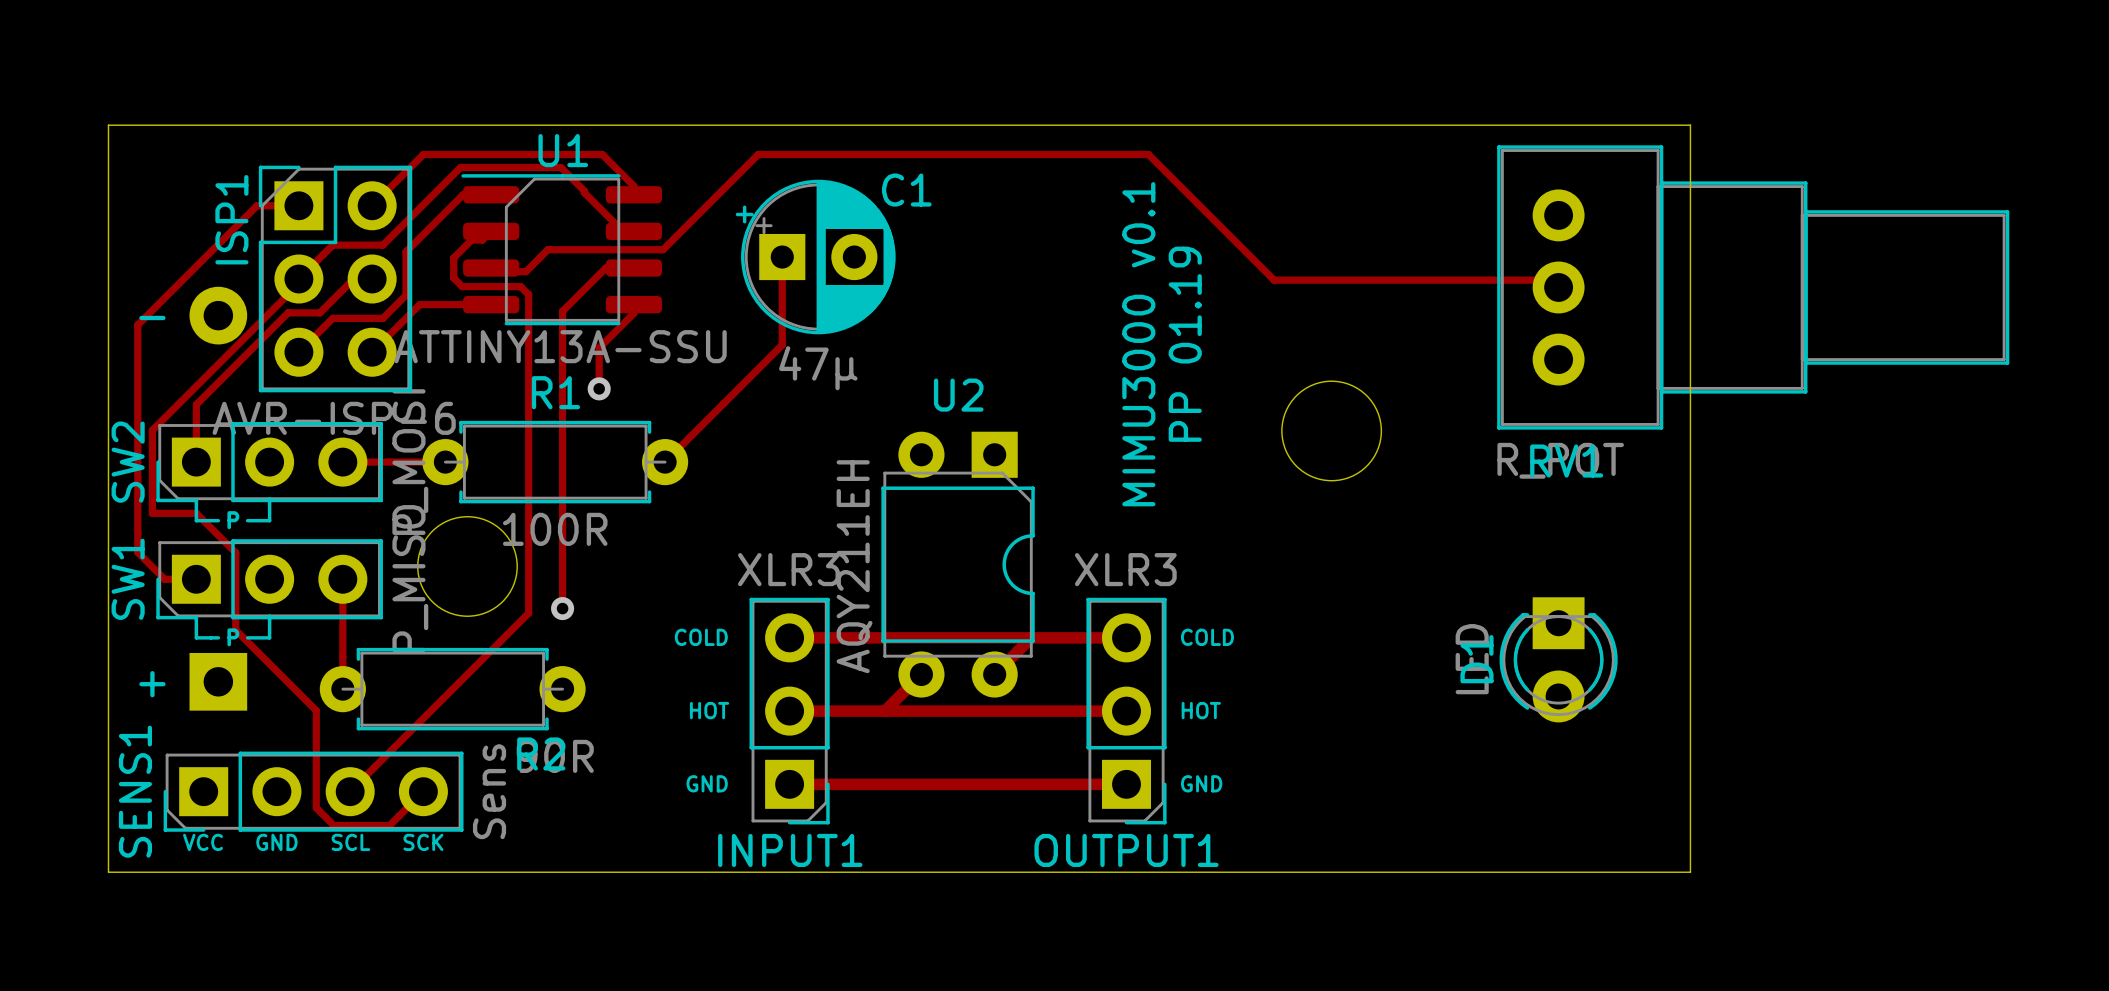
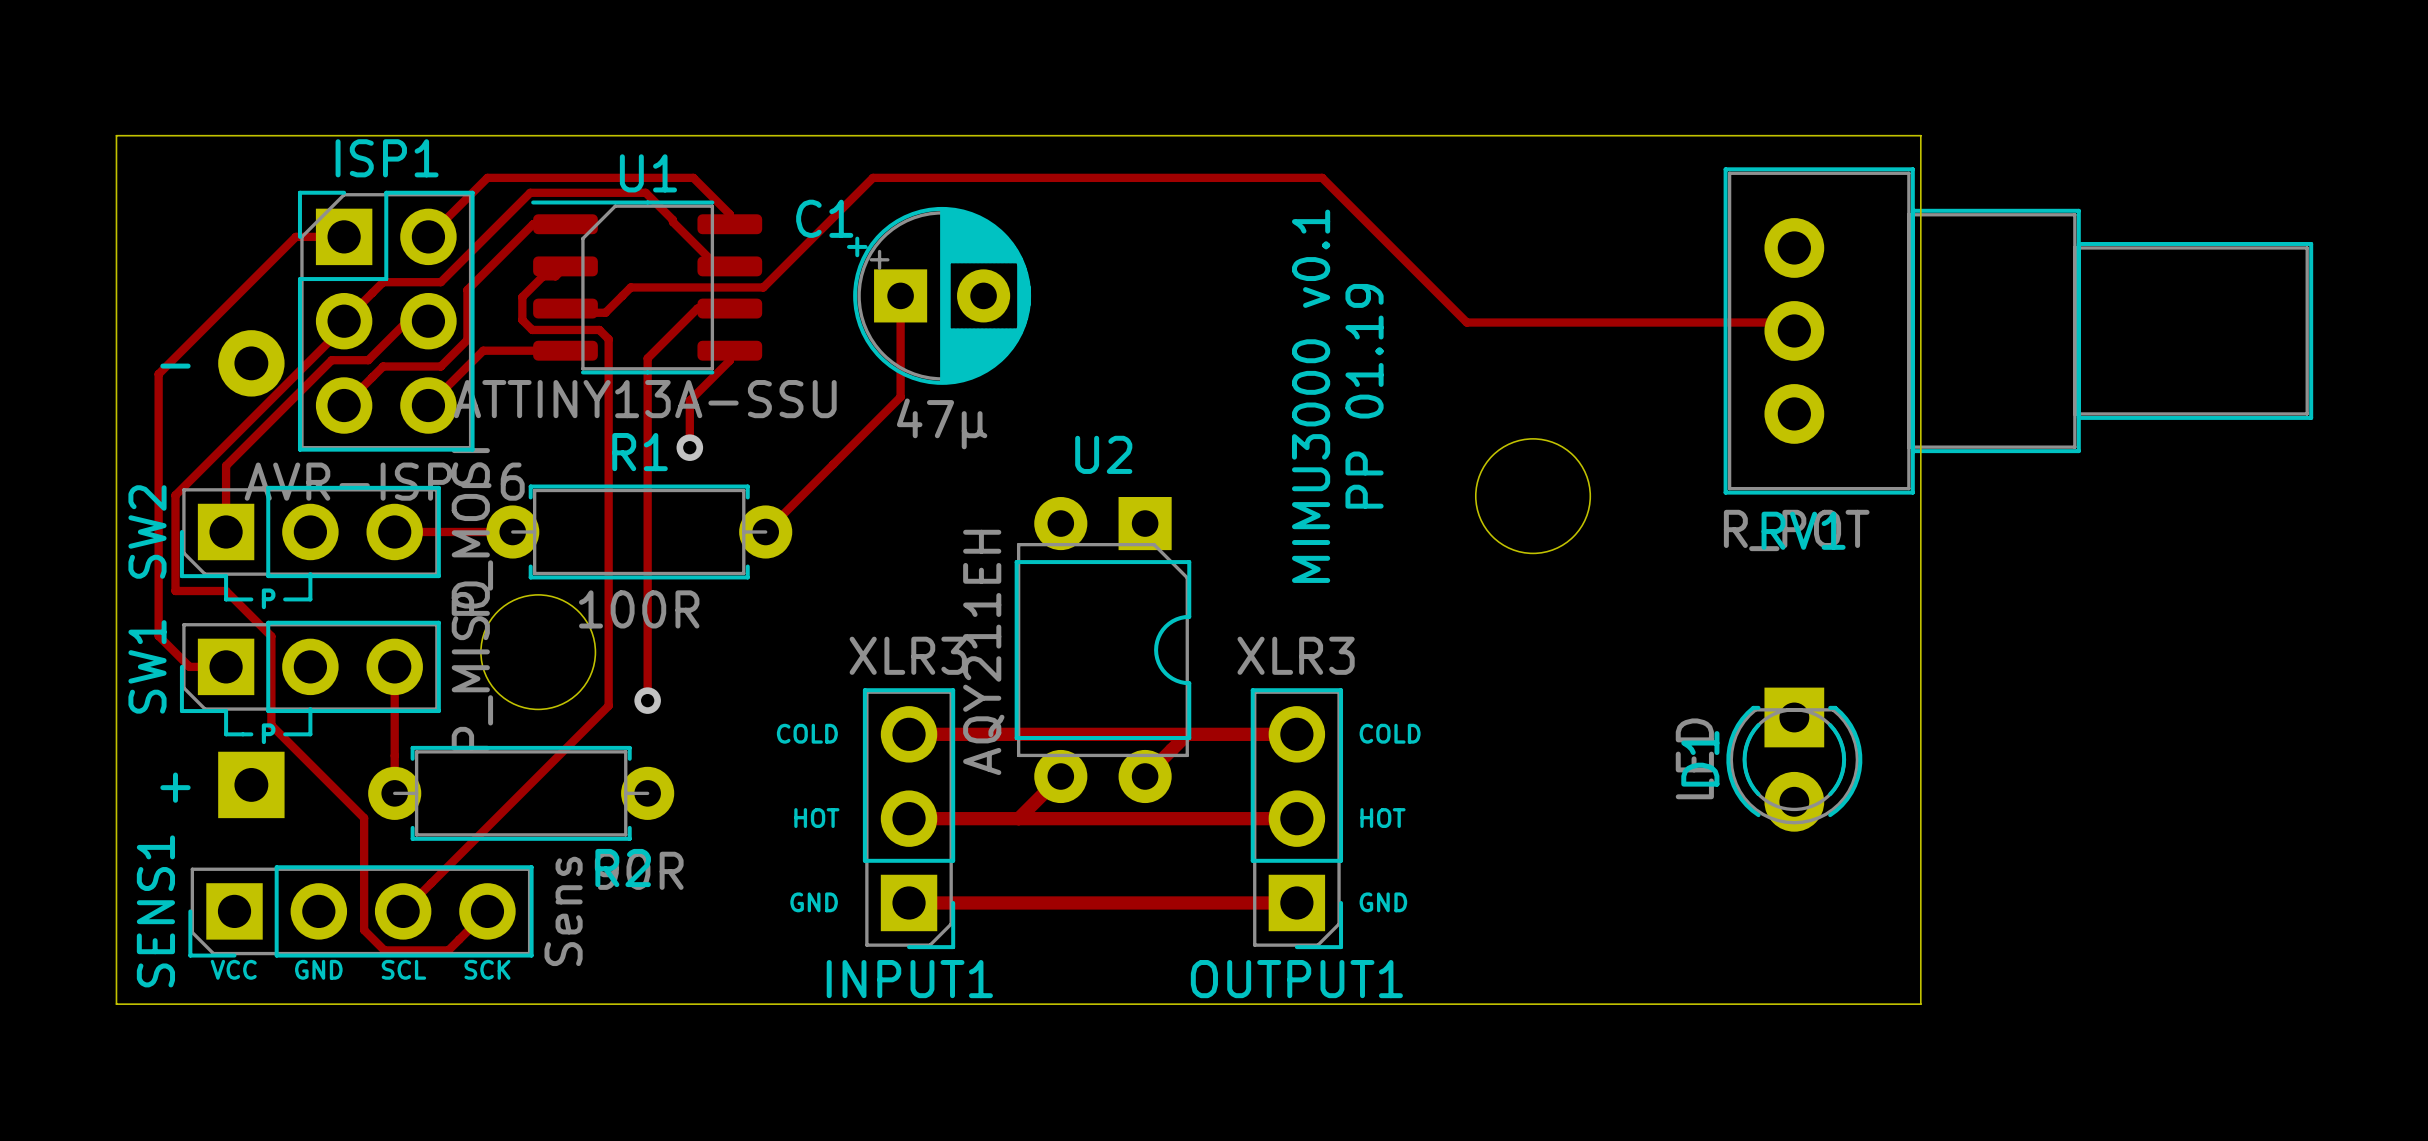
C1 name position: C1 (906, 190) -> C1 (824, 218)
ISP1 name rotation: 0° (231, 219) -> 90° clockwise (387, 158)
ISP1 name position: ISP1 (231, 219) -> ISP1 (387, 158)
board edge: (108, 872) (108, 125) (1690, 125) (1690, 872) (1668, 872) -> (124, 1004) (116, 1004) (116, 135) (1920, 135) (1920, 1004)

